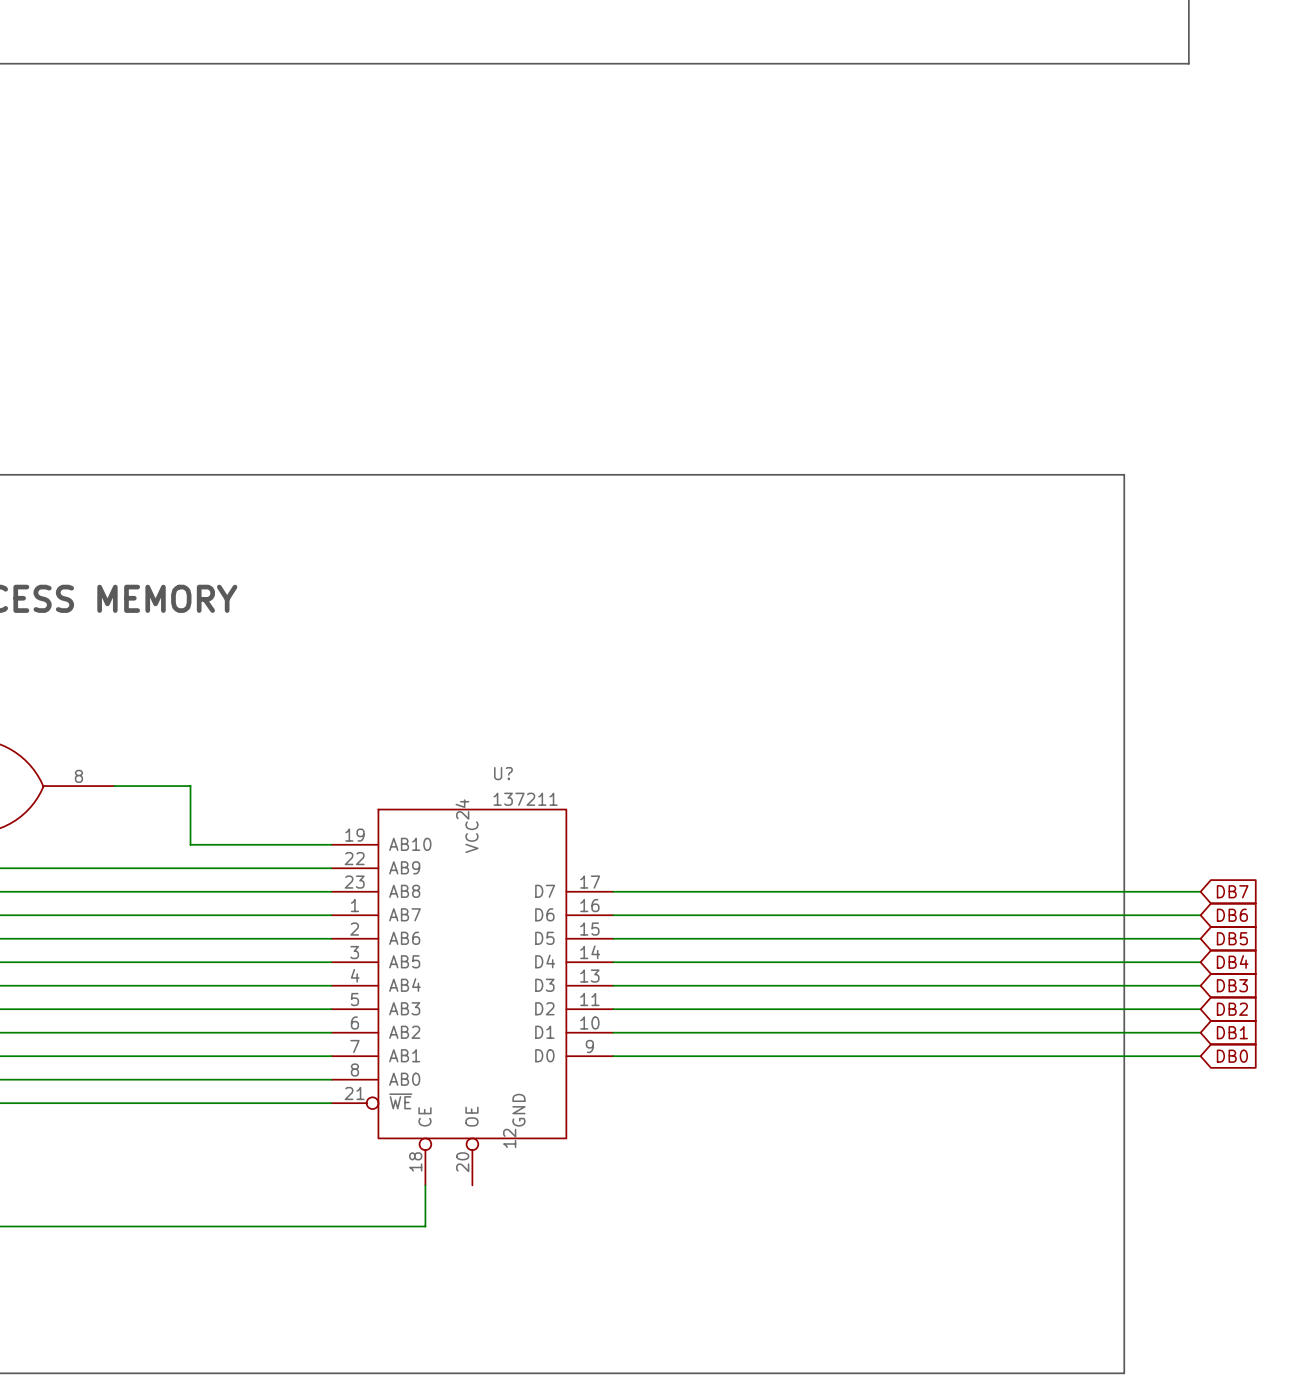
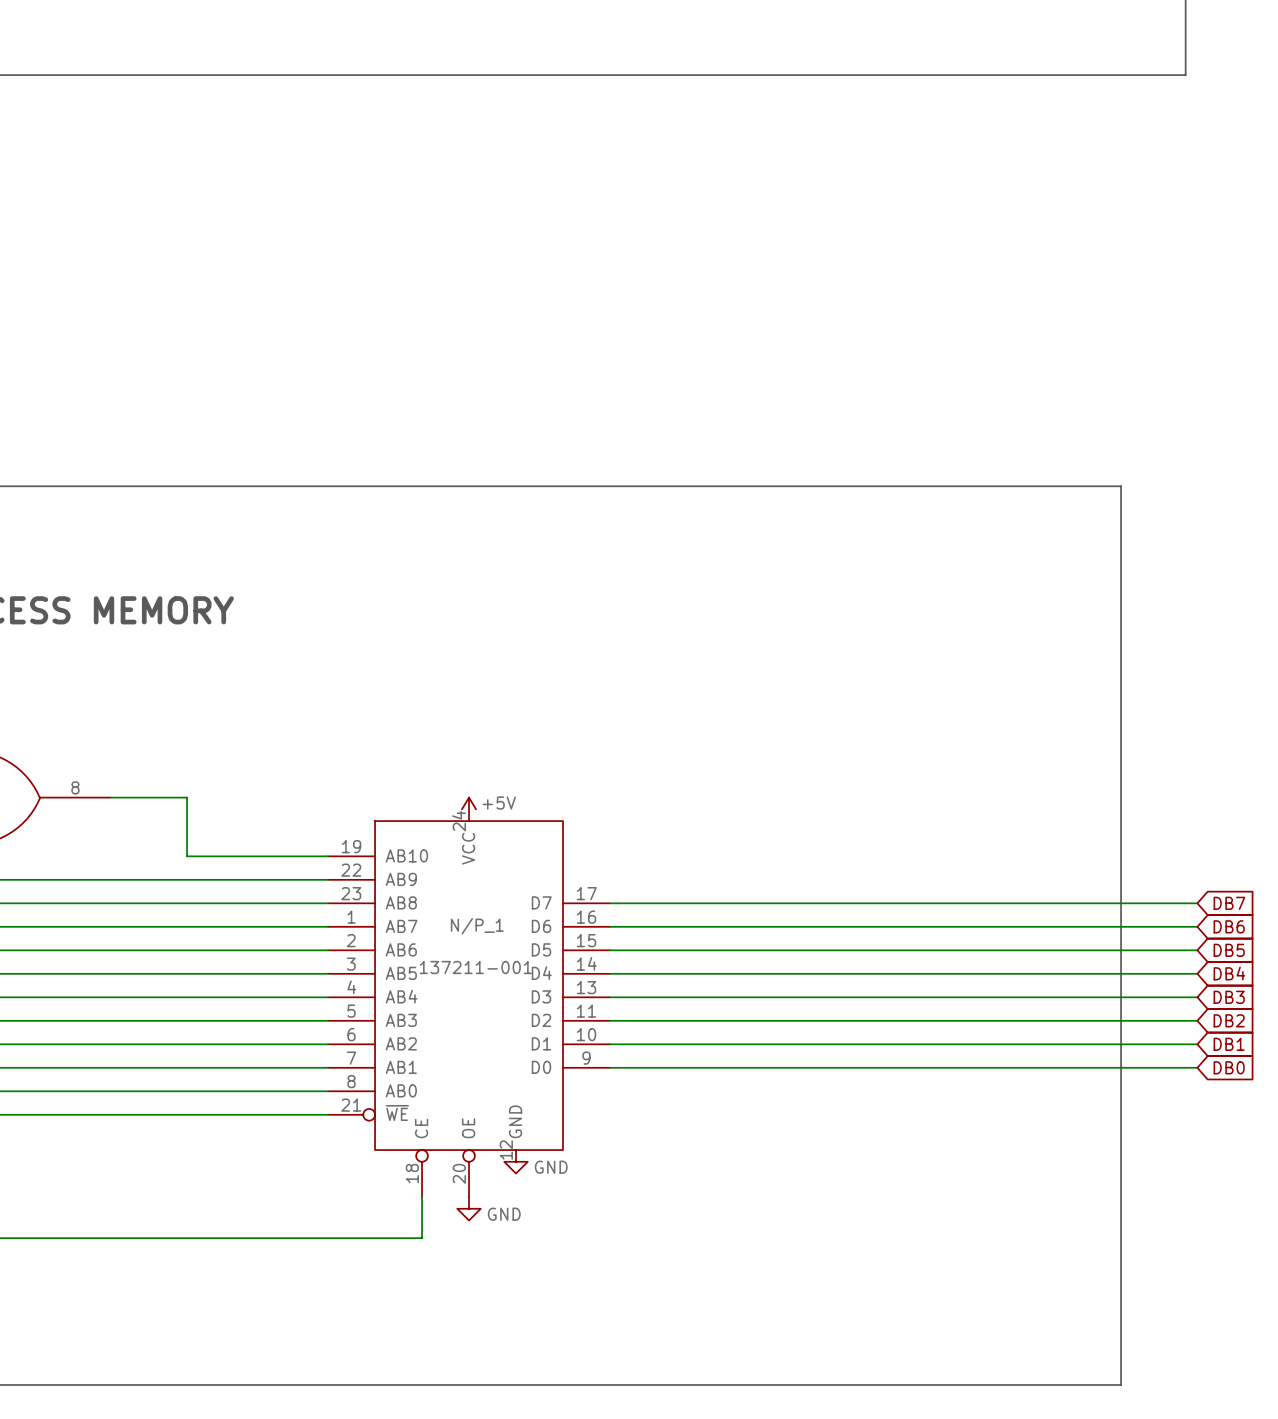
U? name: U? (503, 773) -> N/P_1 (477, 926)
power symbol: none -> +5V (469, 809)
U? value: 137211 (525, 799) -> 137211-001 (475, 967)
power symbol: none -> GND (516, 1161)
power symbol: none -> GND (469, 1208)

